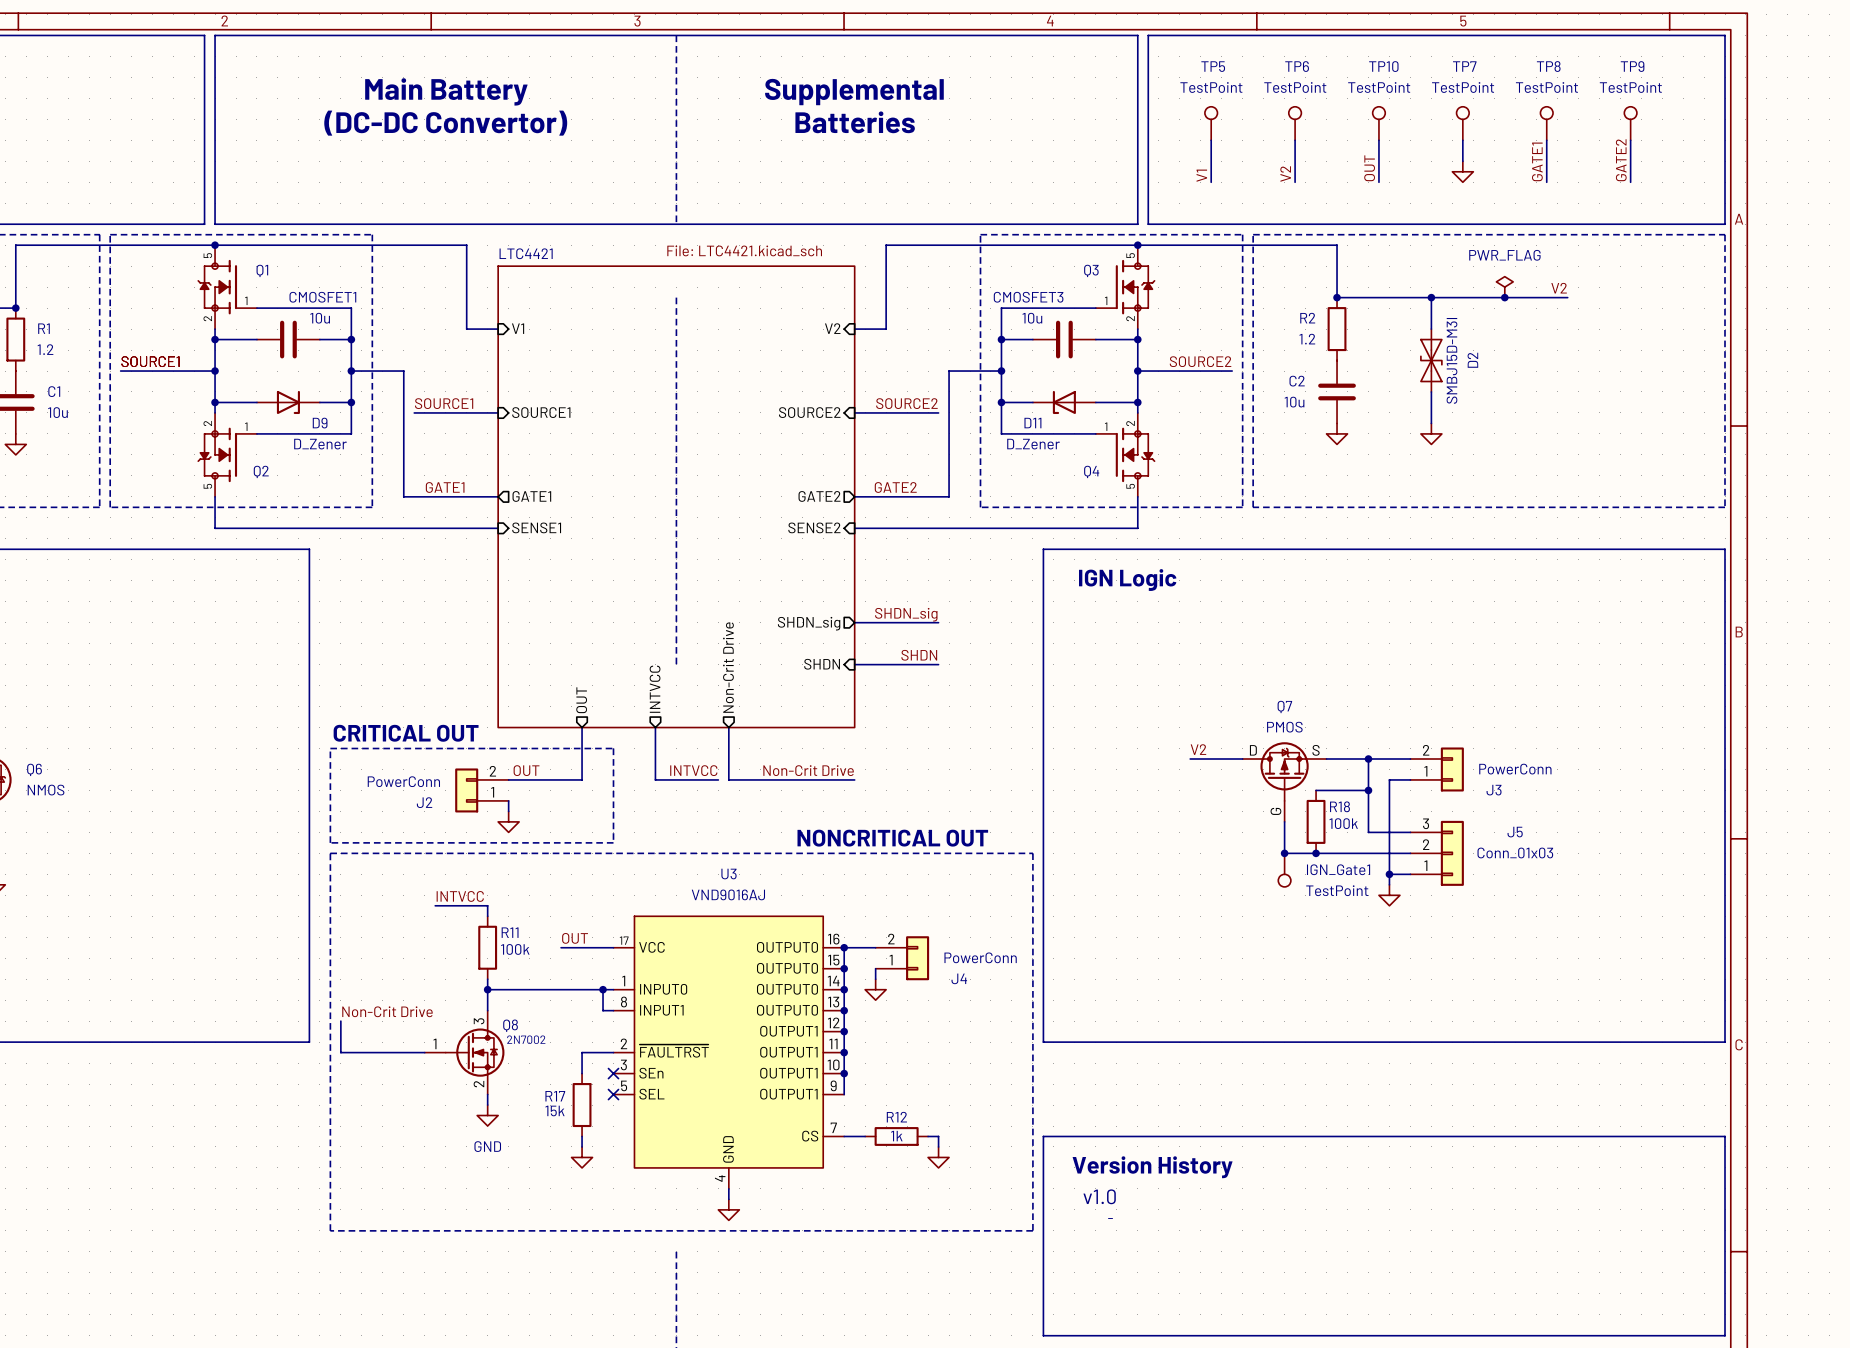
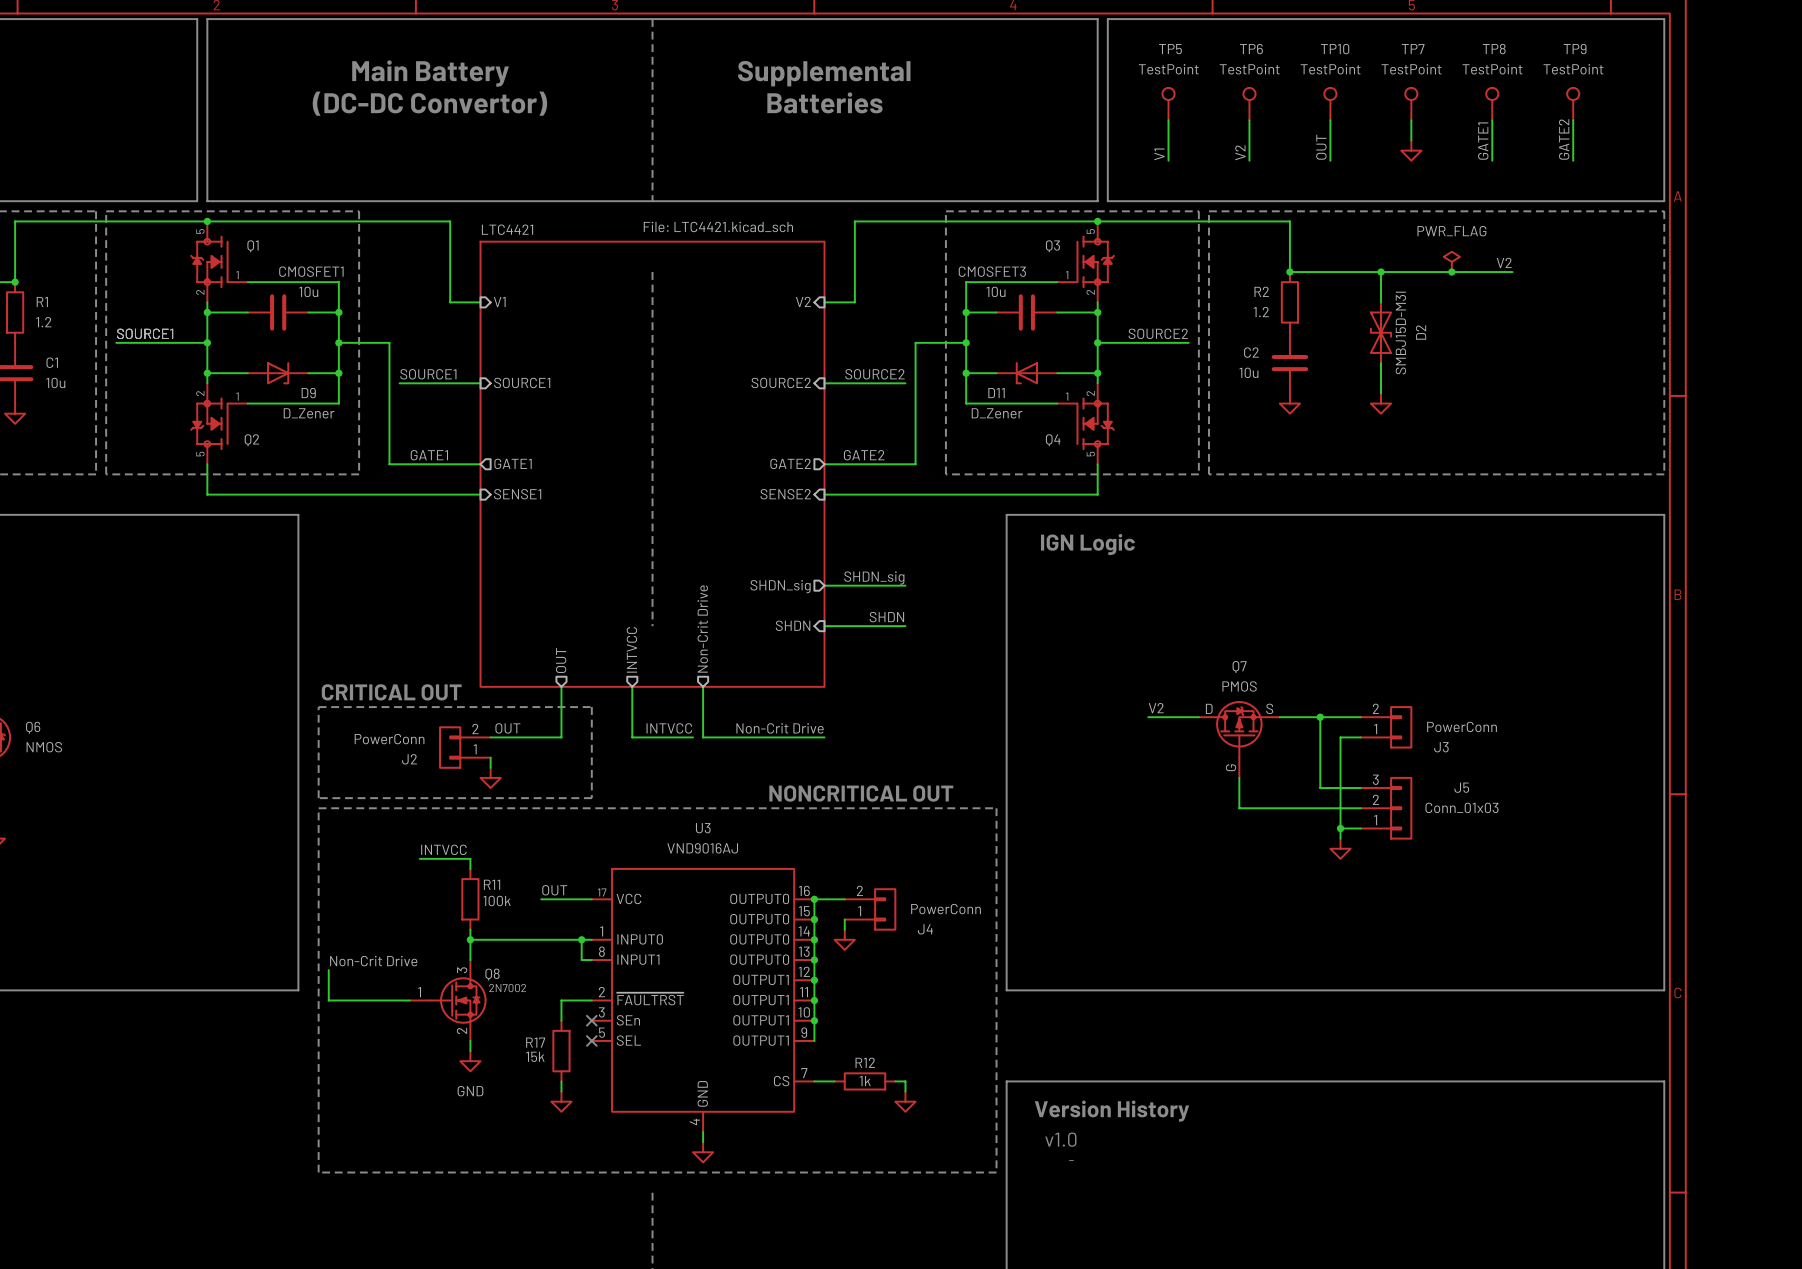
wire: (1316, 790) (1368, 790) -> none
junction: (1368, 790) -> none
R18: 100k (1316, 821) -> none
junction: (1284, 853) -> none
junction: (1316, 853) -> none
IGN_Gate1: TestPoint (1284, 870) -> none

